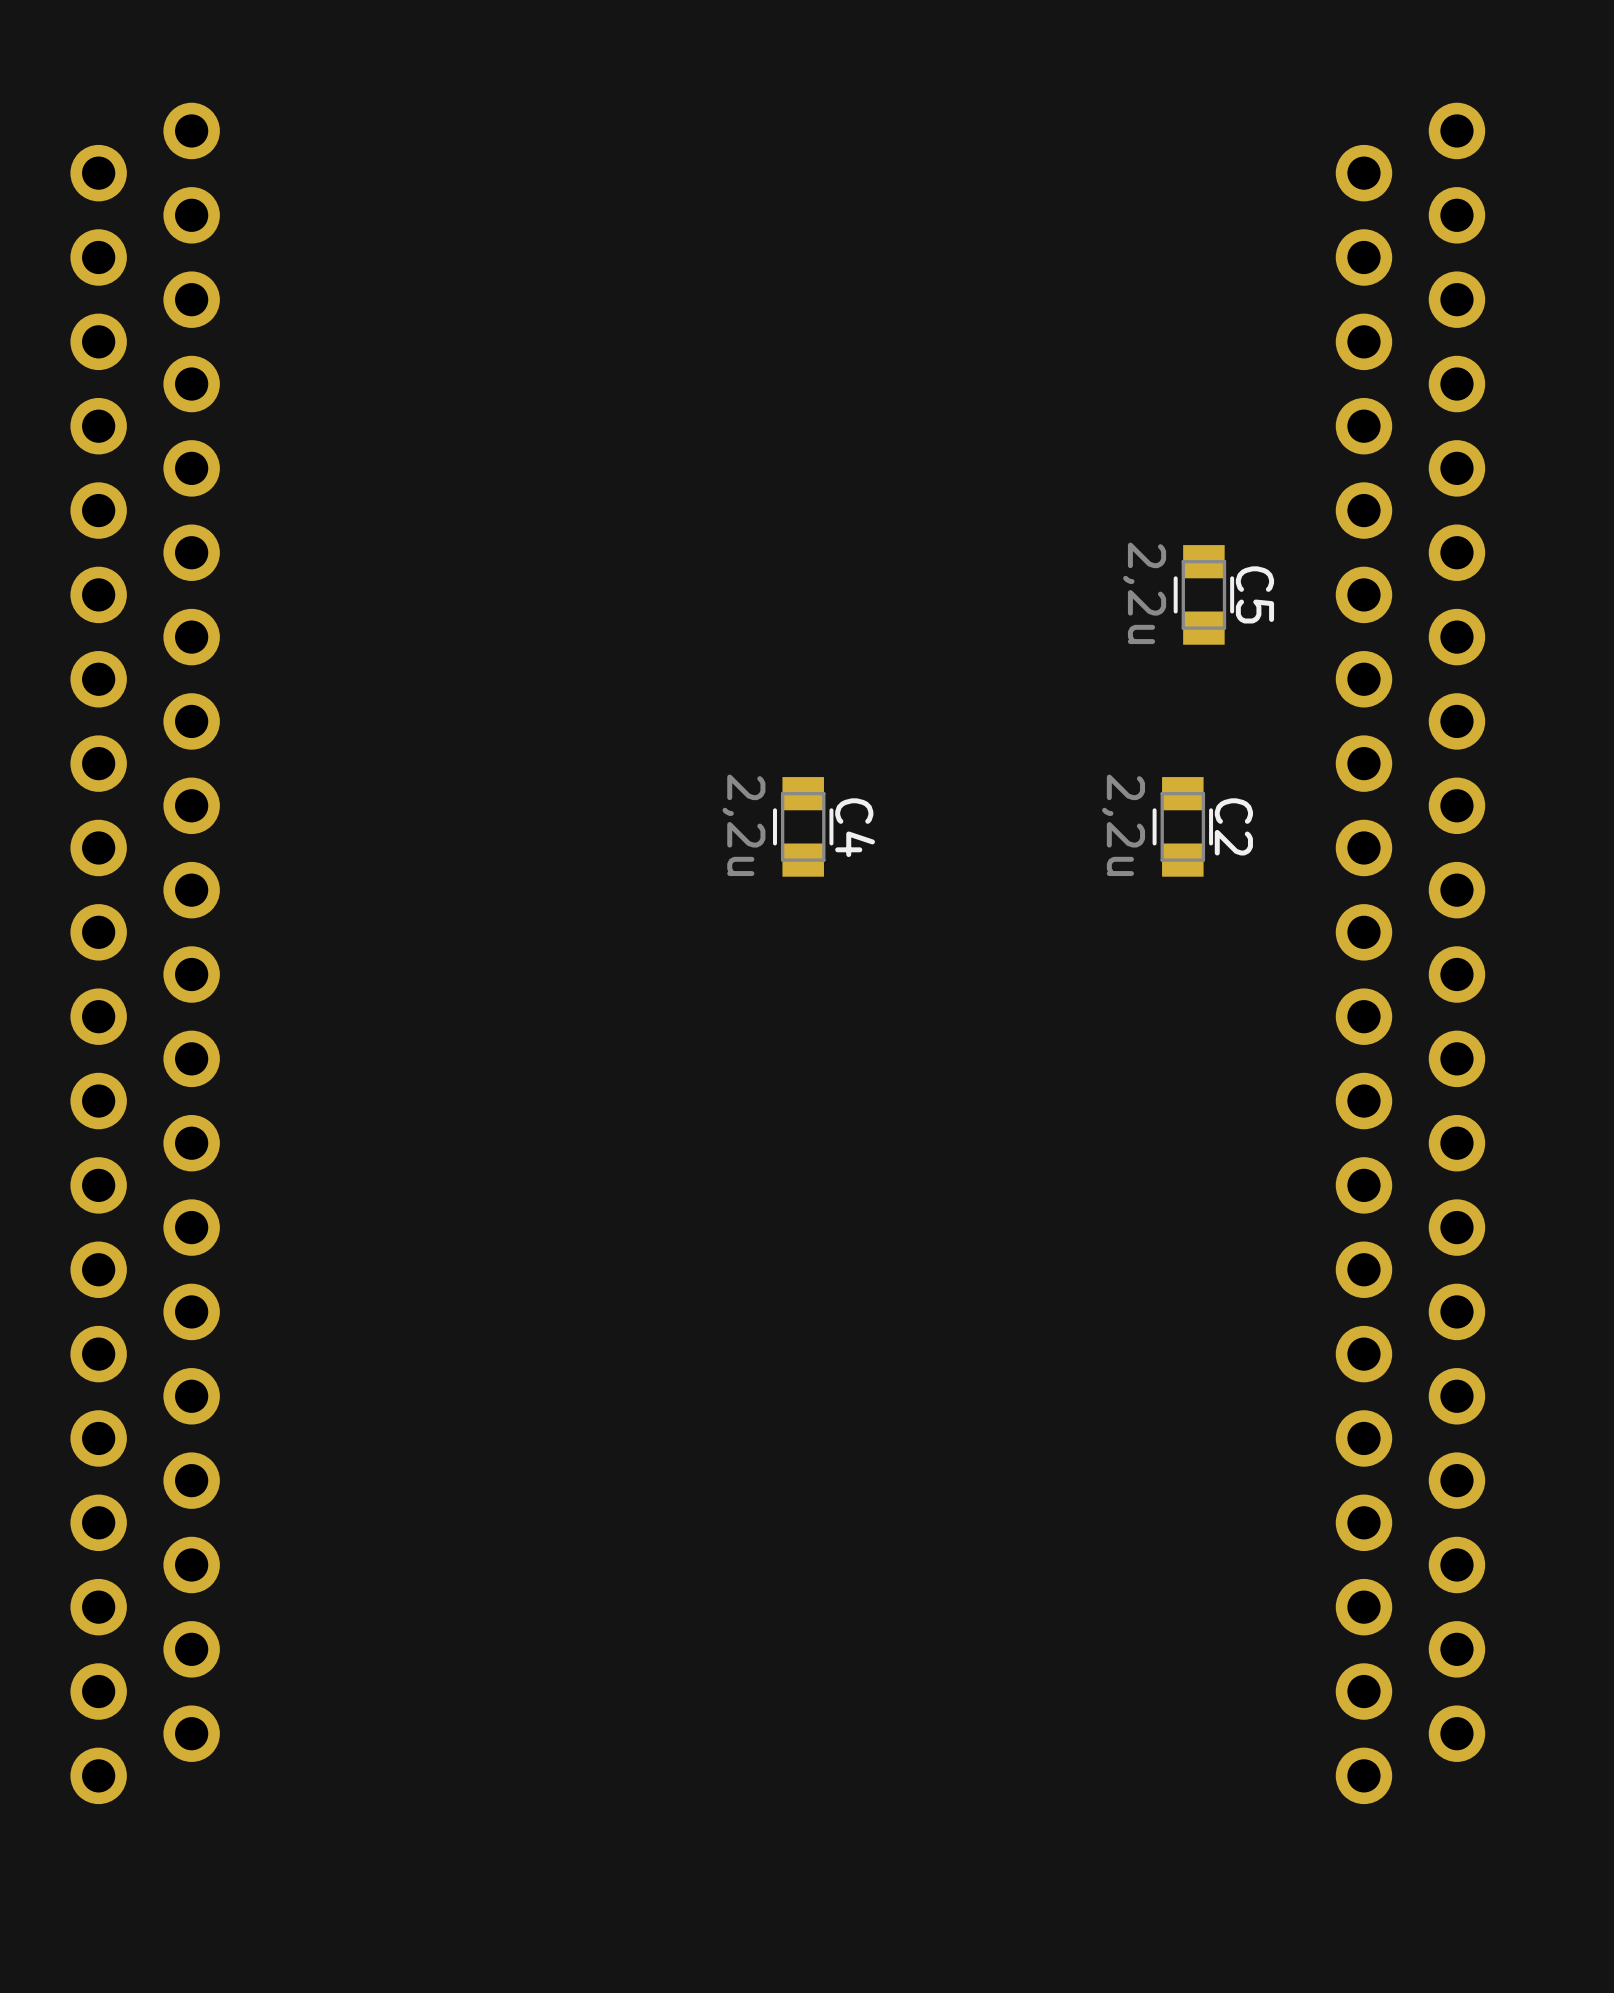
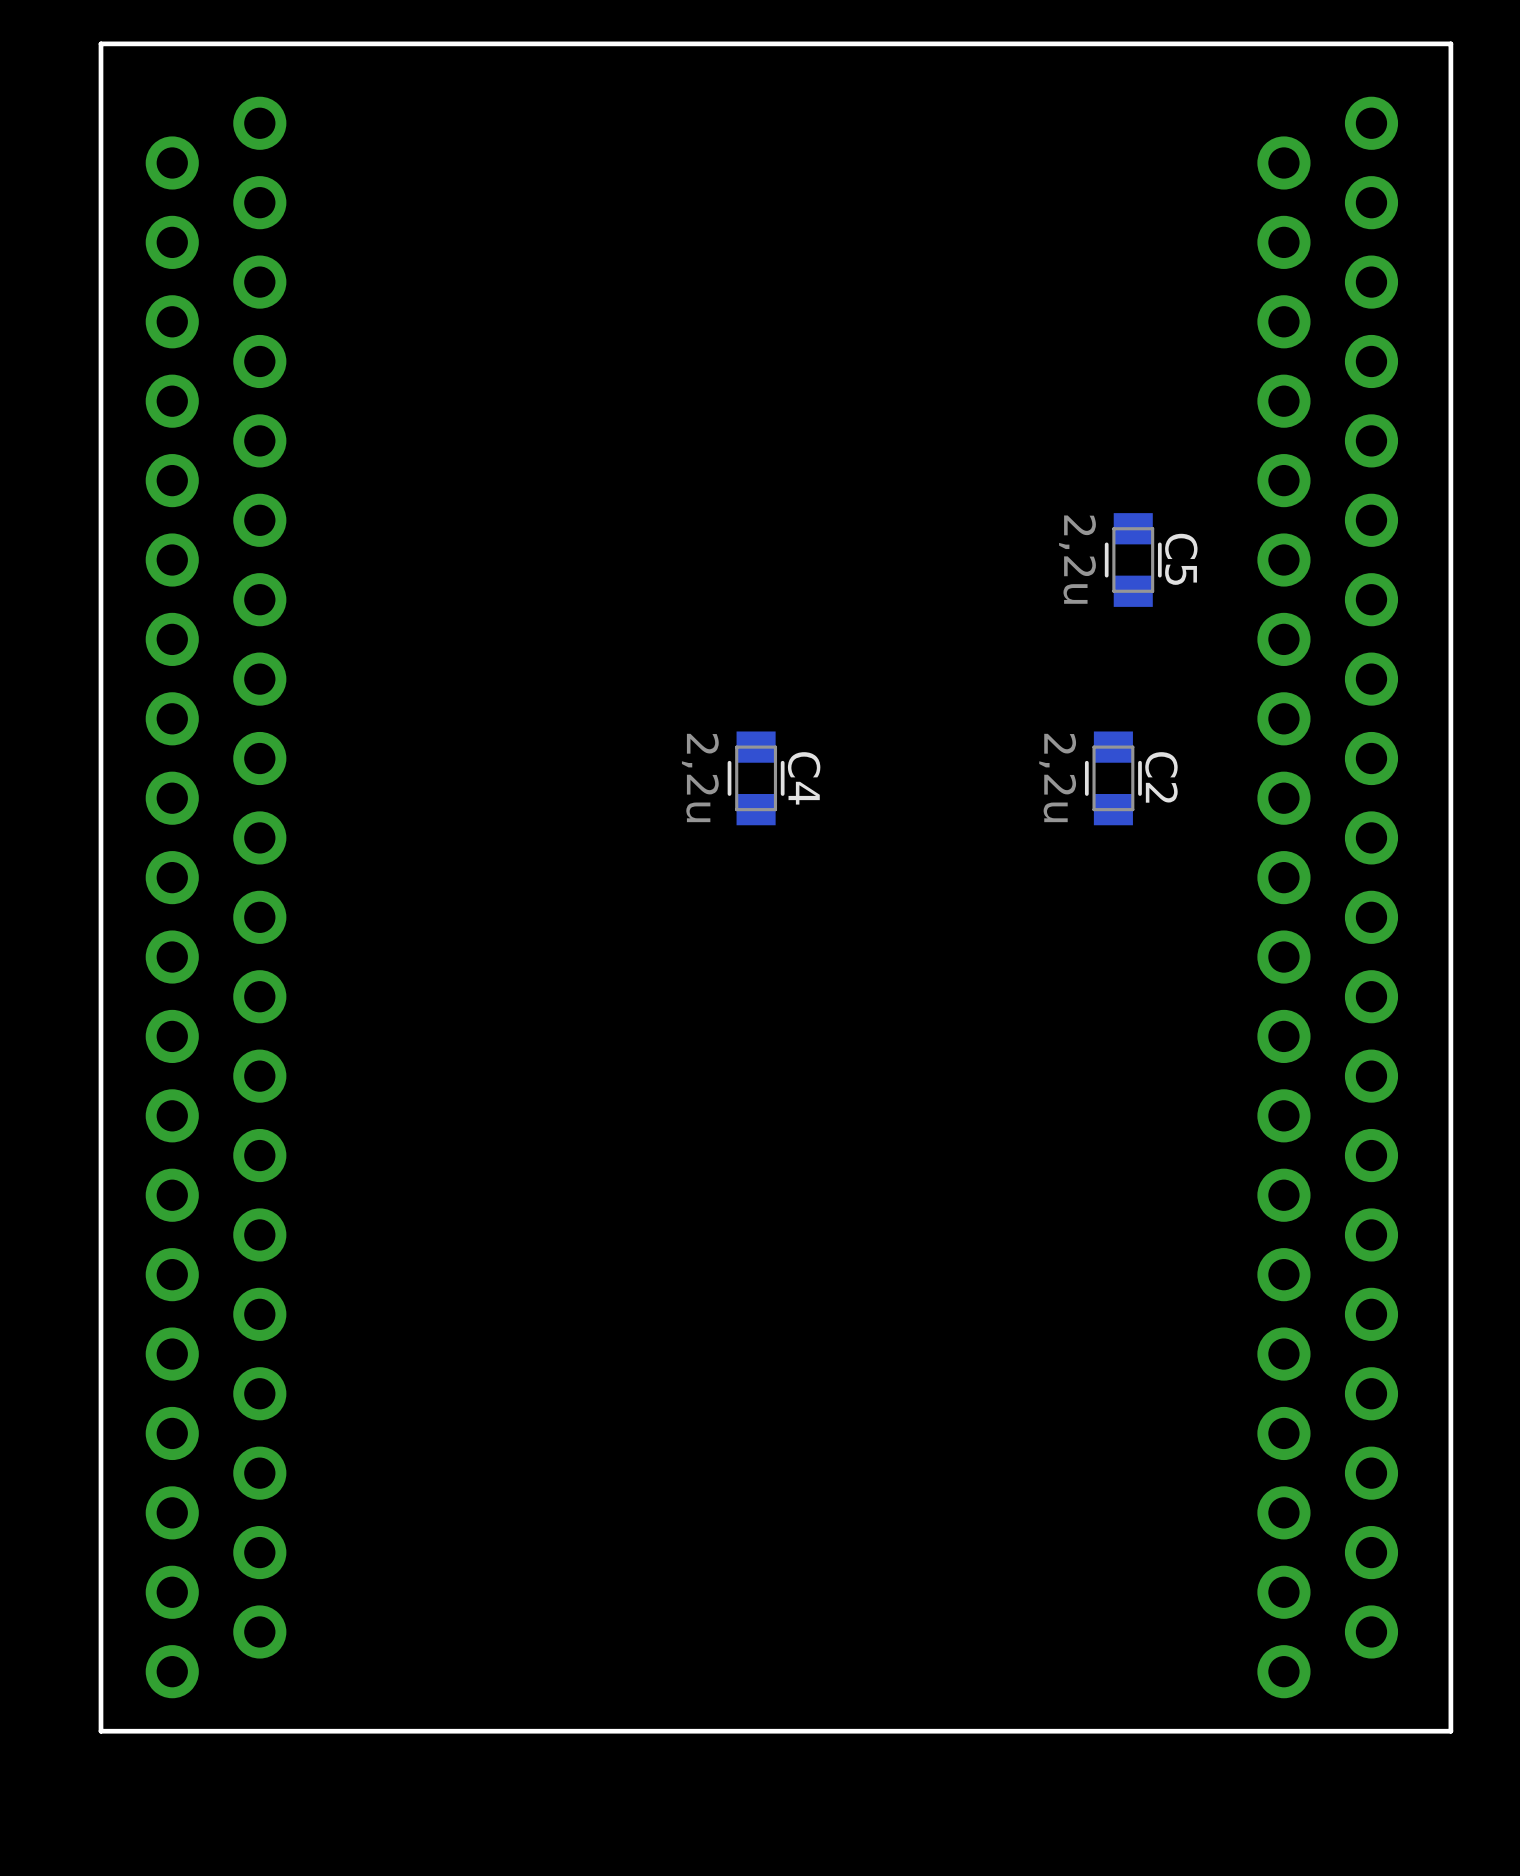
board edge: none -> (1450, 43) (1450, 1731) (100, 1731) (100, 43) (1450, 43)
part position: (145, 953) -> (216, 897)

